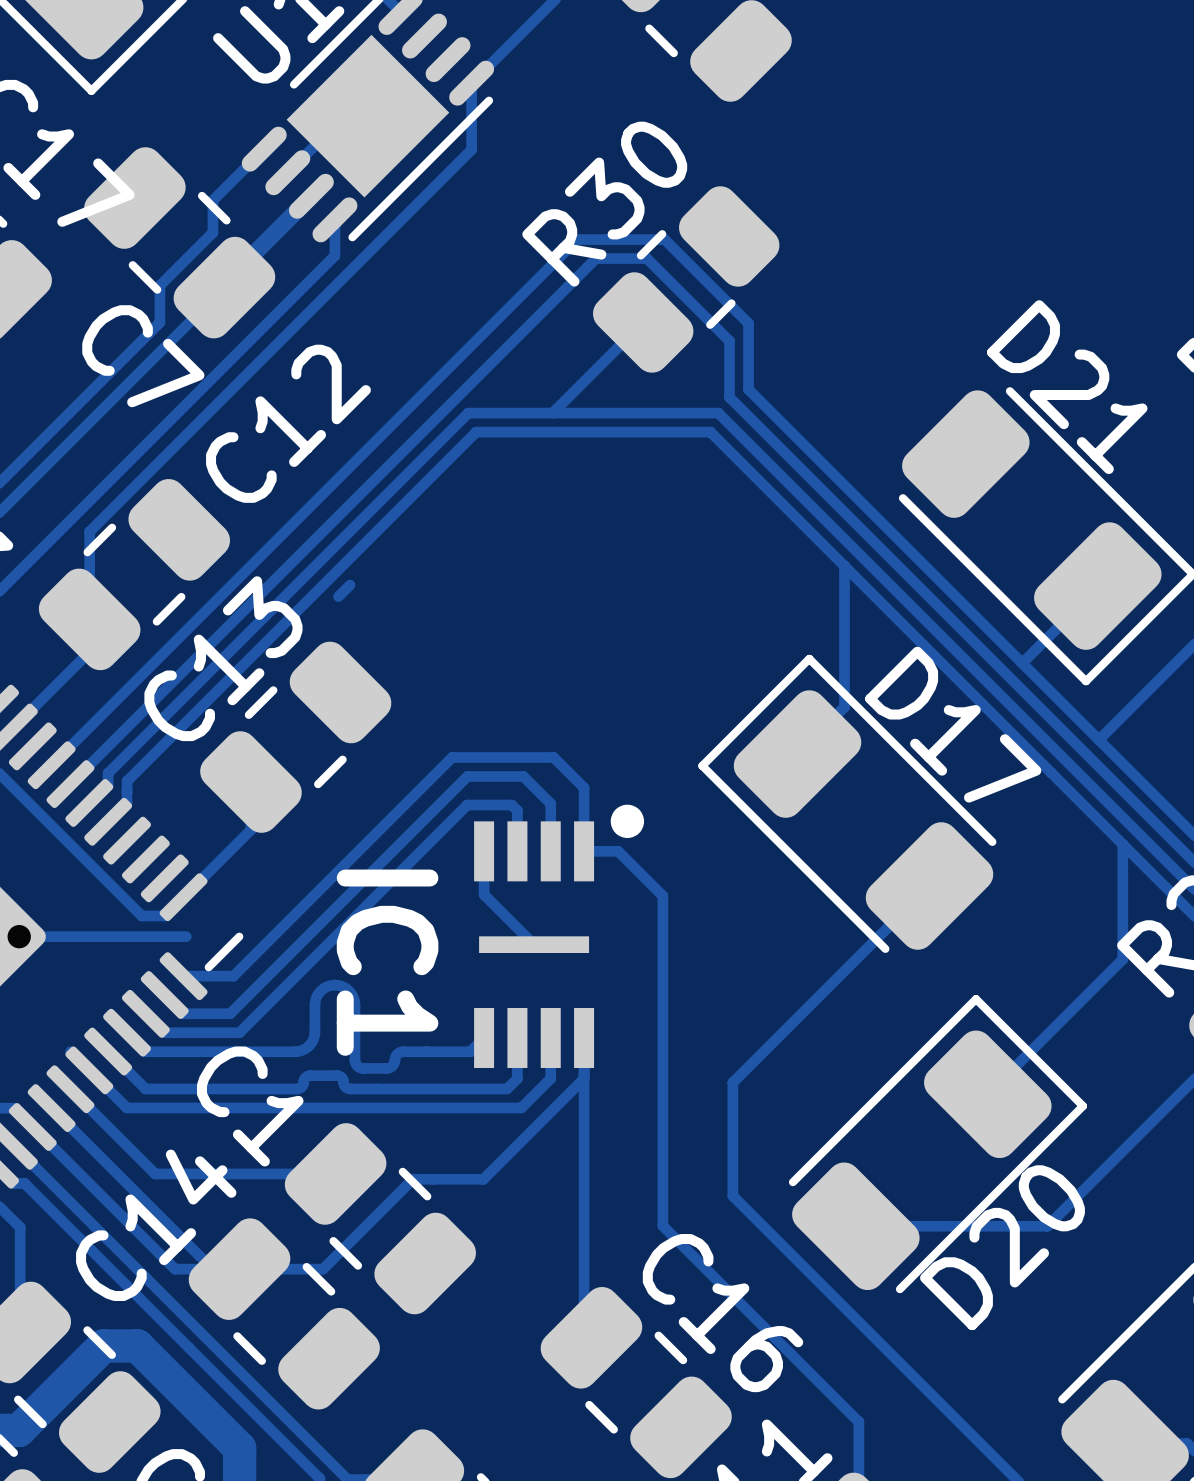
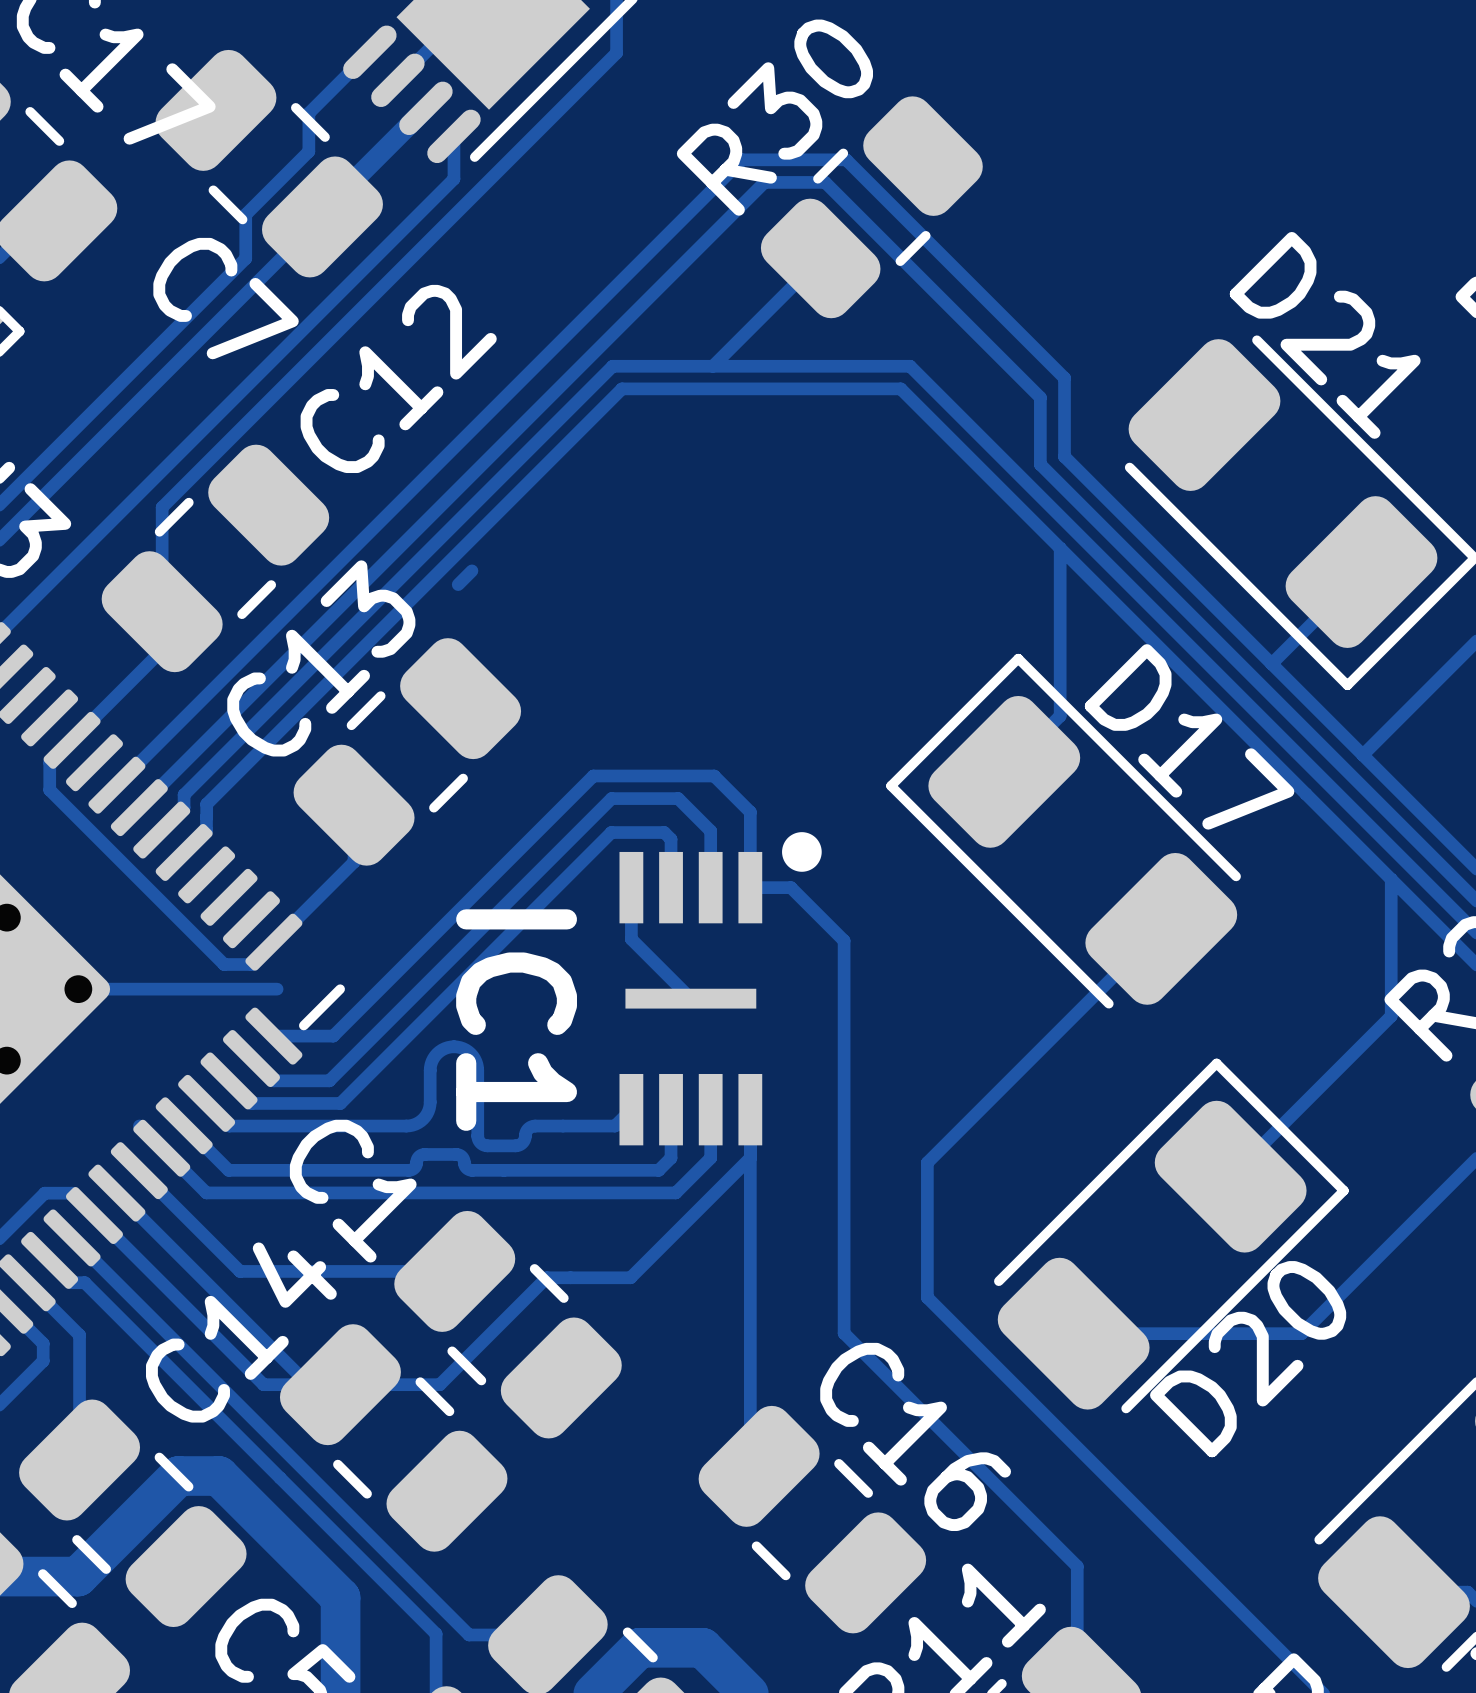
track: (748, 323) (748, 389) (848, 489) -> (945, 259) (1064, 378) (1064, 456)
track: (729, 341) (729, 397) (827, 495) -> (923, 280) (1040, 397) (1040, 464)

